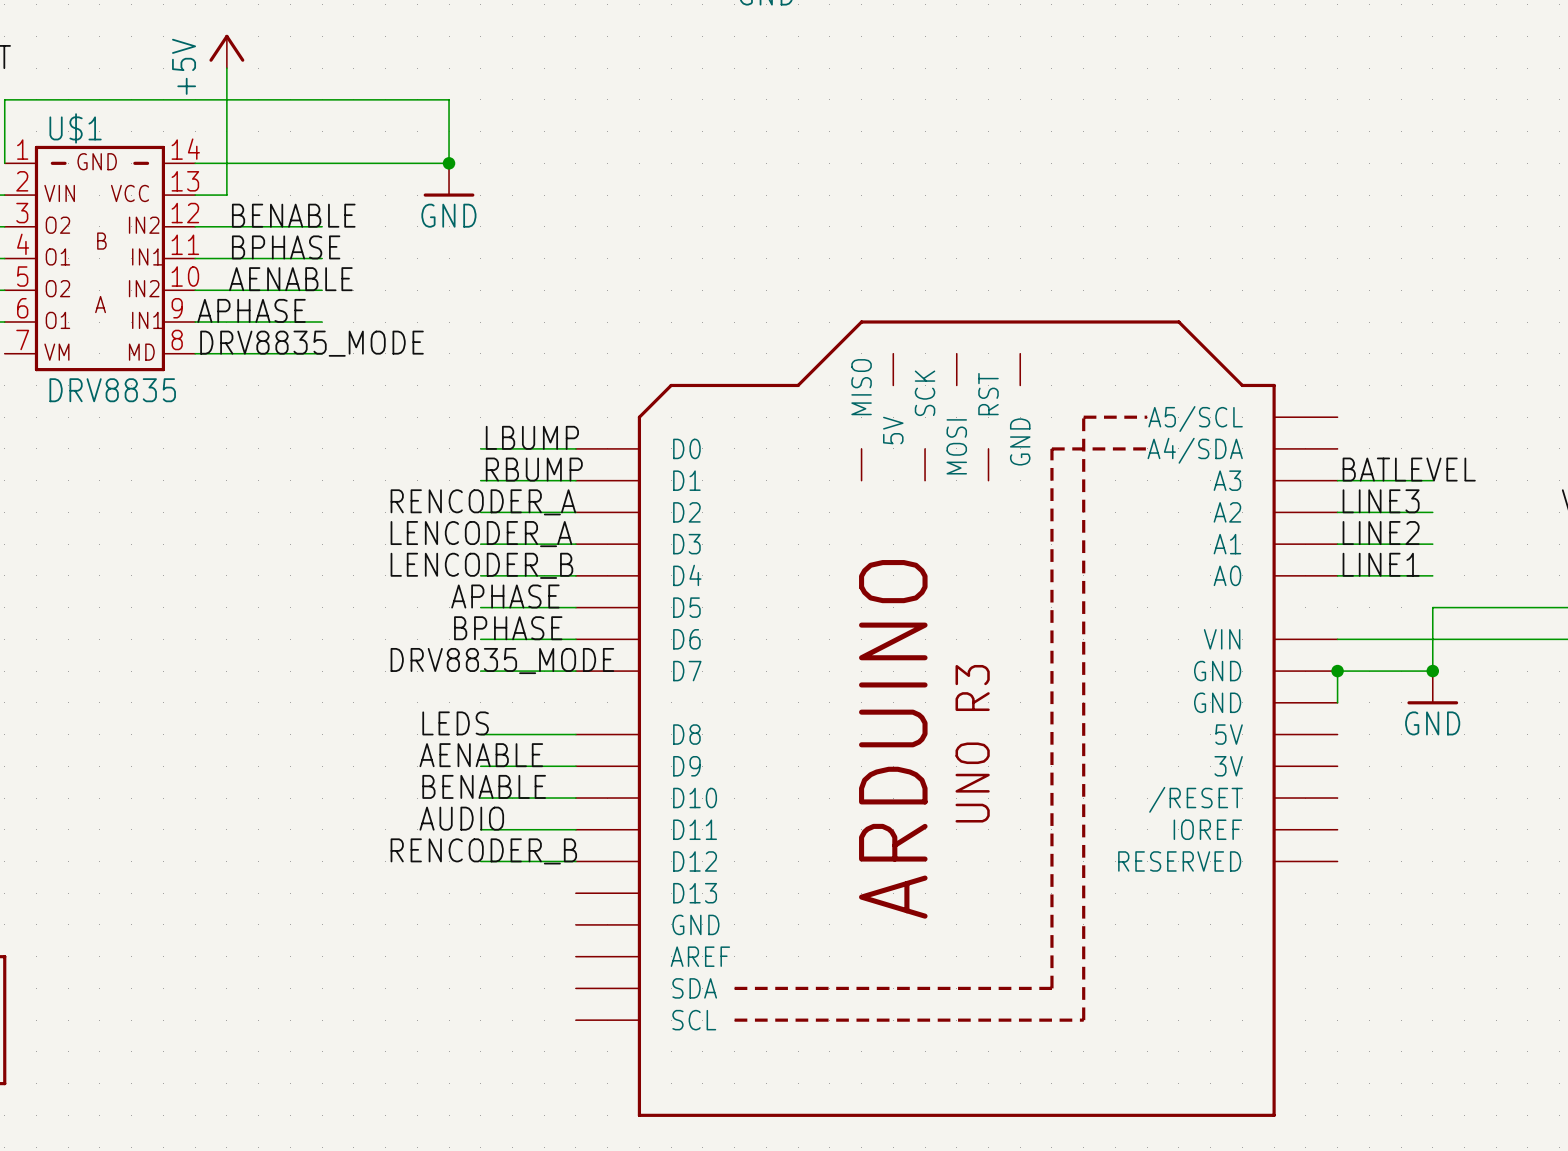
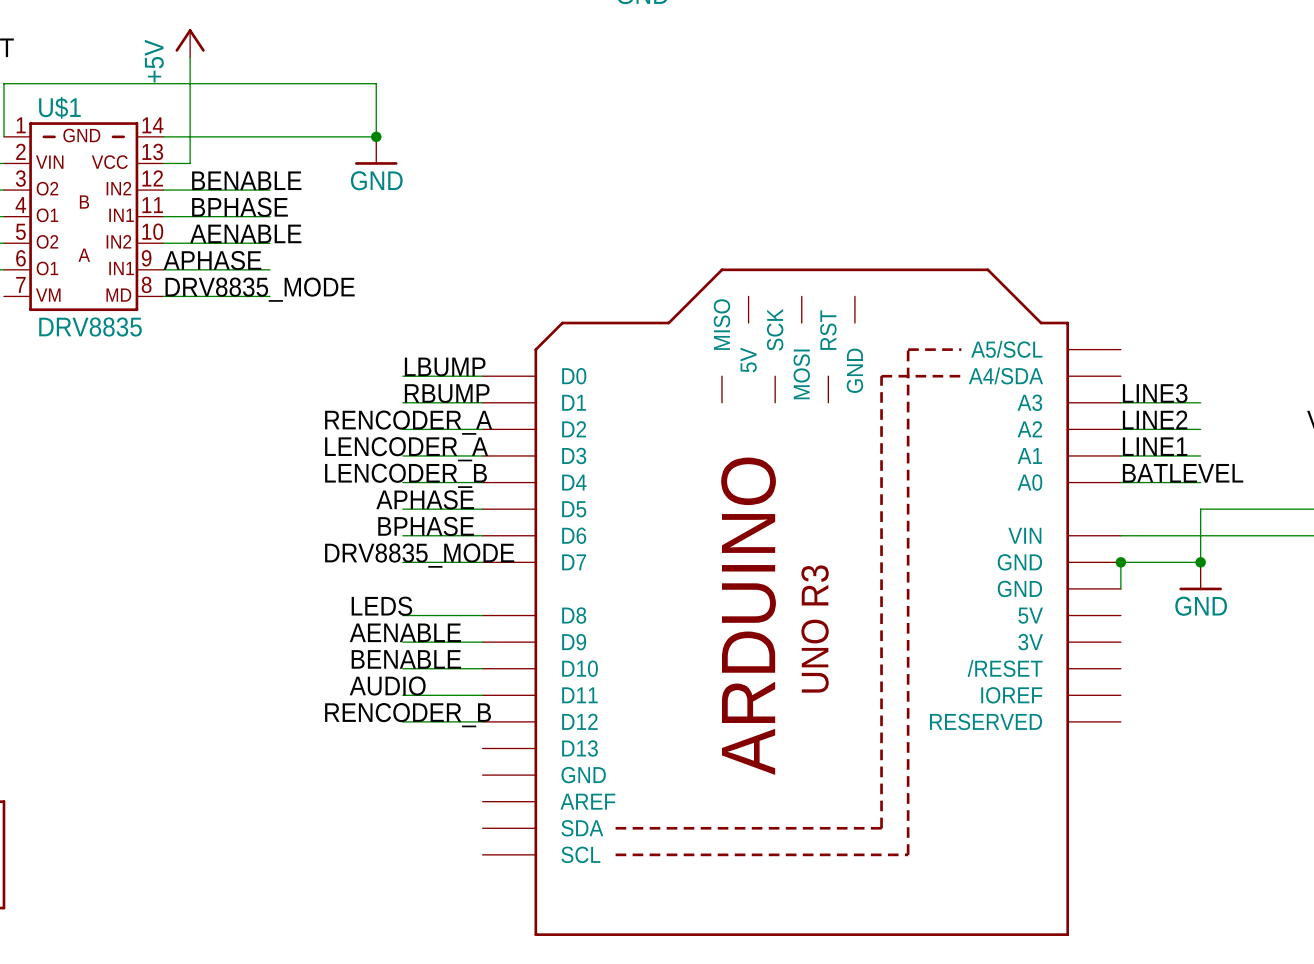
label: BATLEVEL (1409, 469) -> LINE3 (1155, 393)
label: LINE3 (1381, 501) -> LINE2 (1155, 419)
label: LINE2 (1381, 533) -> LINE1 (1155, 446)
label: LINE1 (1381, 564) -> BATLEVEL (1183, 473)

